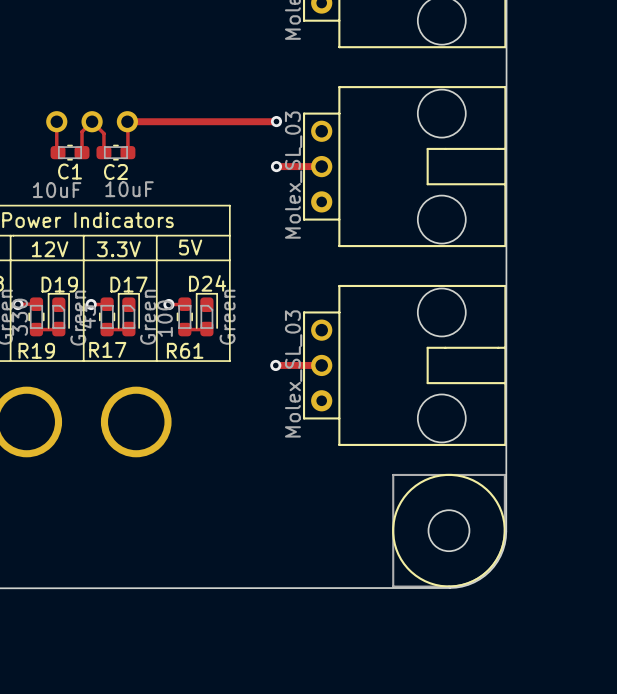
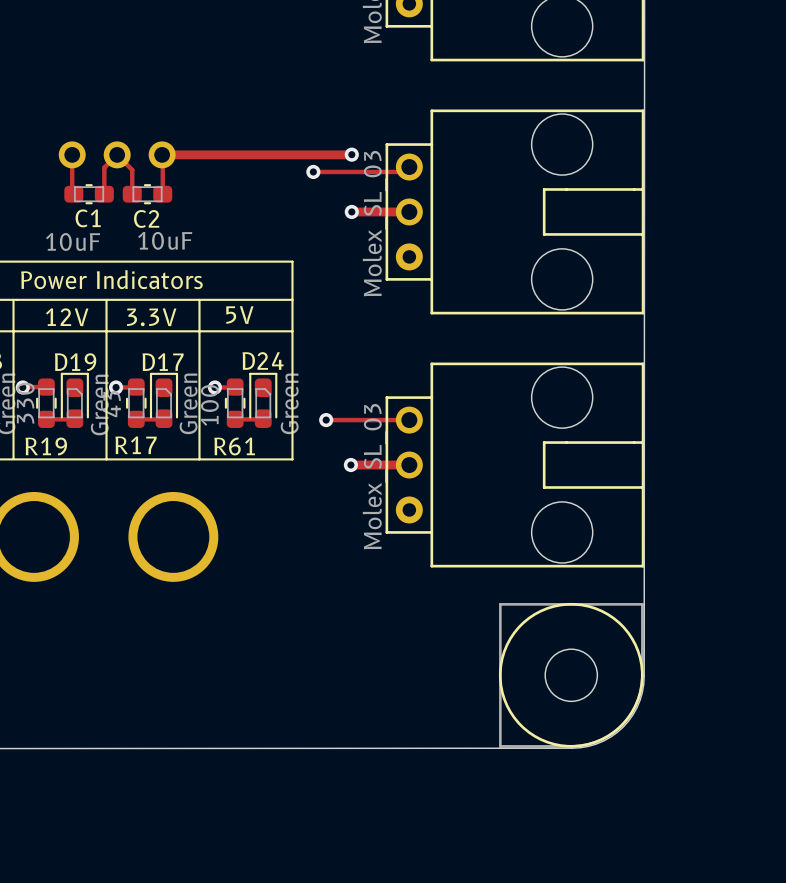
track: none -> (409, 167) (404, 171) (313, 171)
via: none -> (313, 171)
track: none -> (326, 420) (409, 420)
via: none -> (326, 420)

